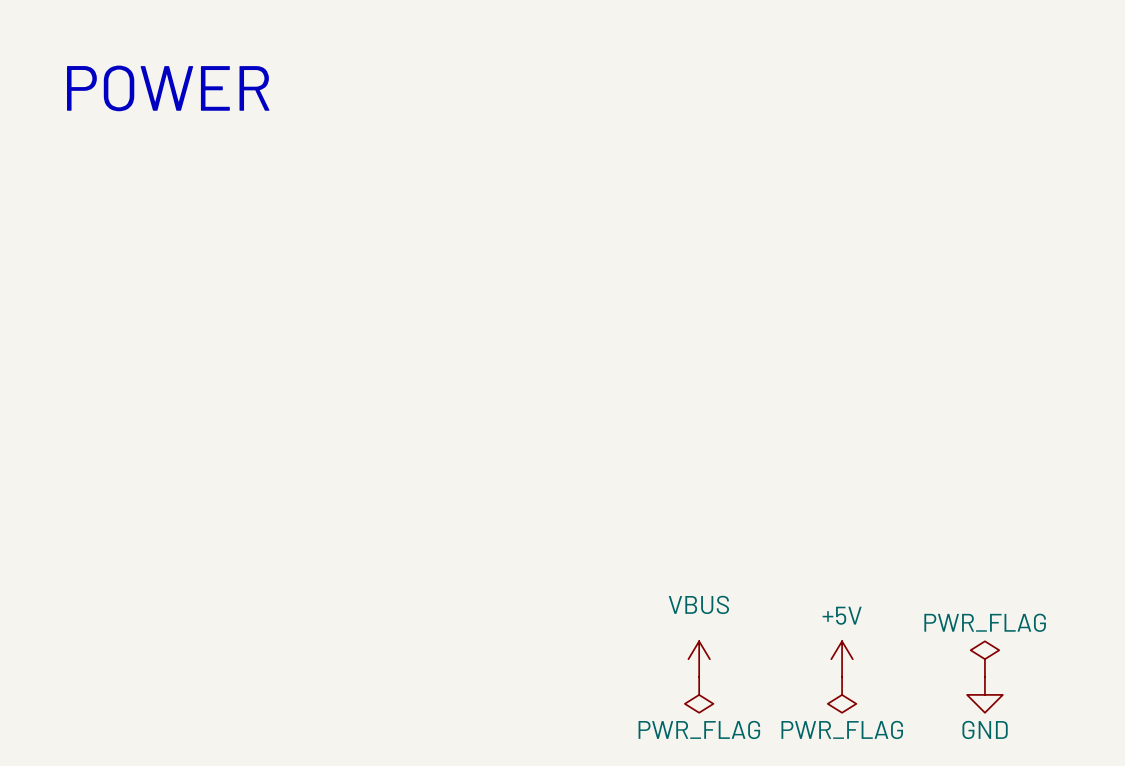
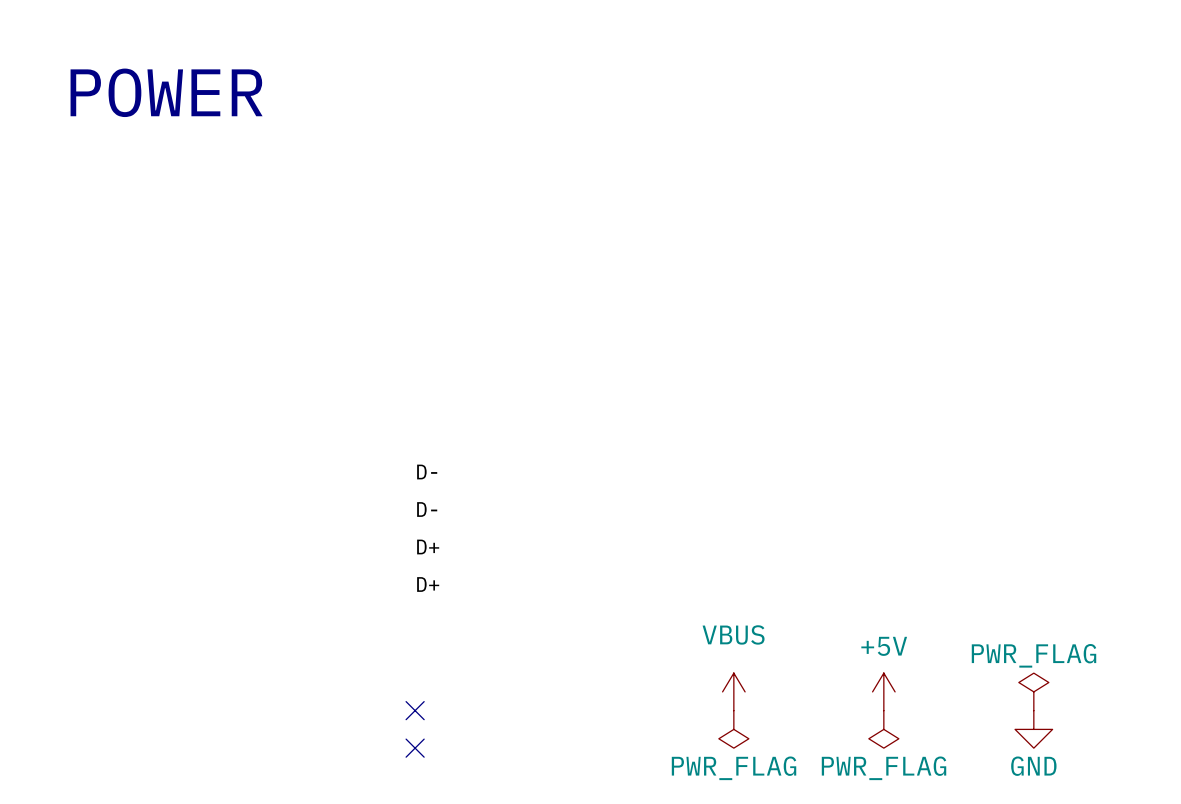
label: none -> D- (427, 472)
label: none -> D- (427, 509)
label: none -> D+ (428, 547)
label: none -> D+ (428, 584)
no-connect mark: none -> (415, 710)
no-connect mark: none -> (415, 748)

